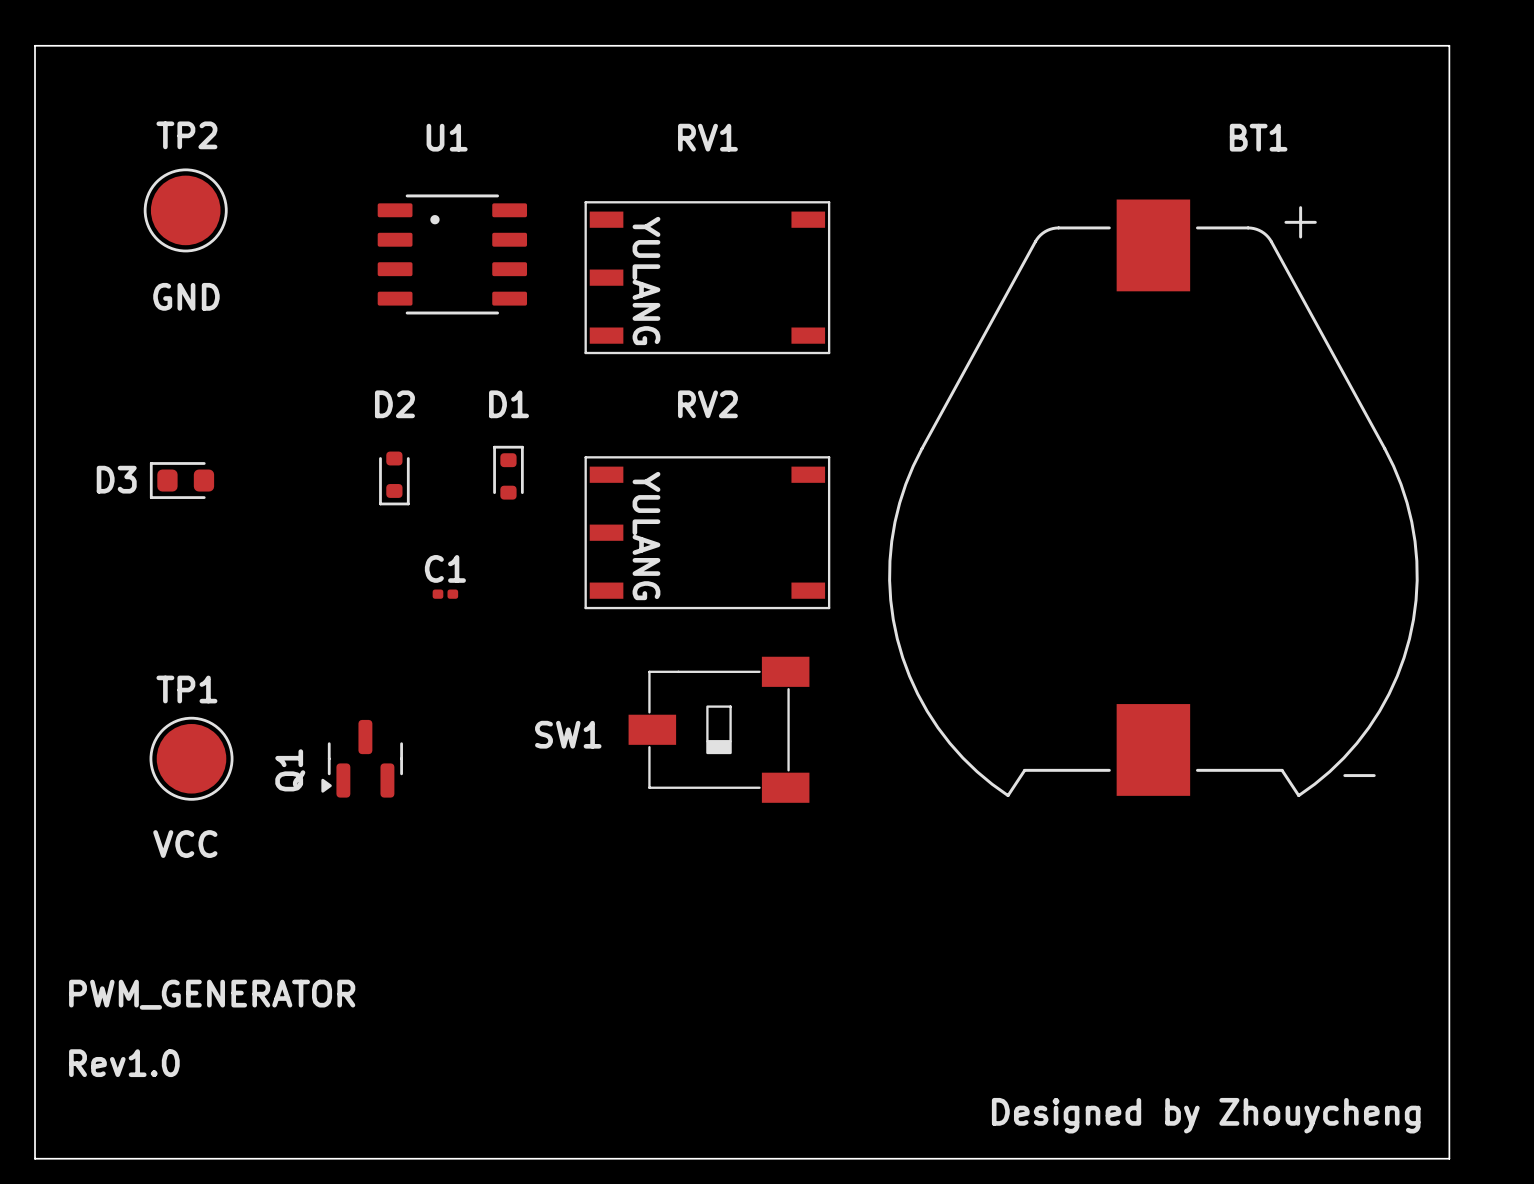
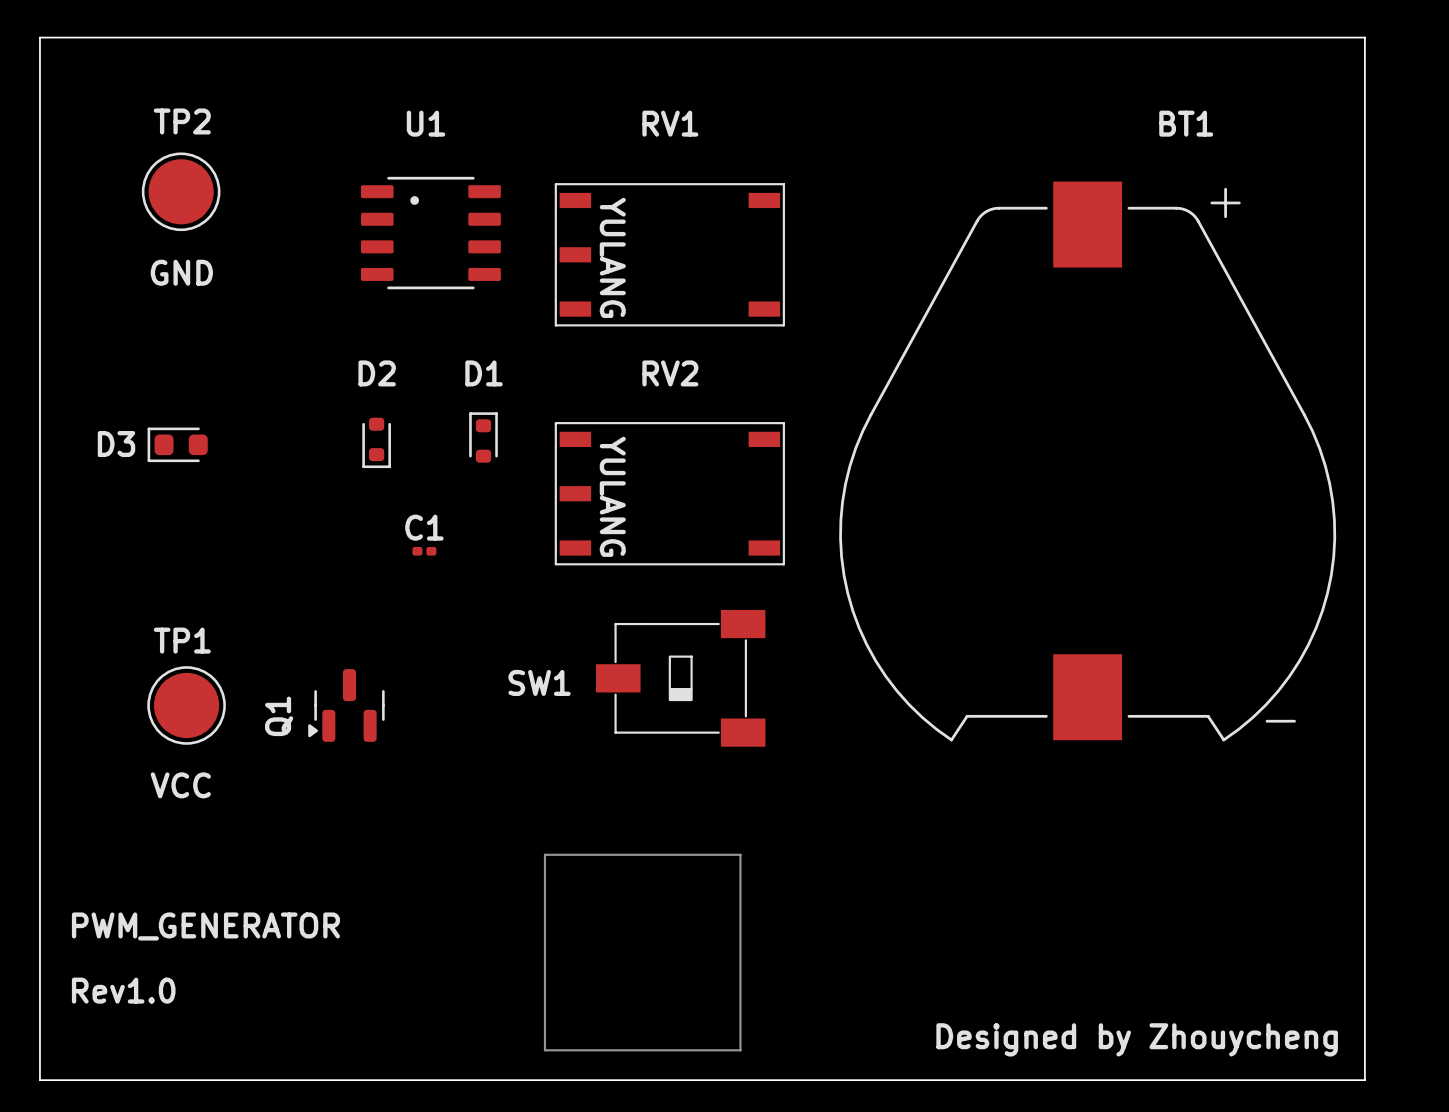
line: none -> (544, 854) (740, 854) (740, 1050) (544, 1050) (544, 854)

